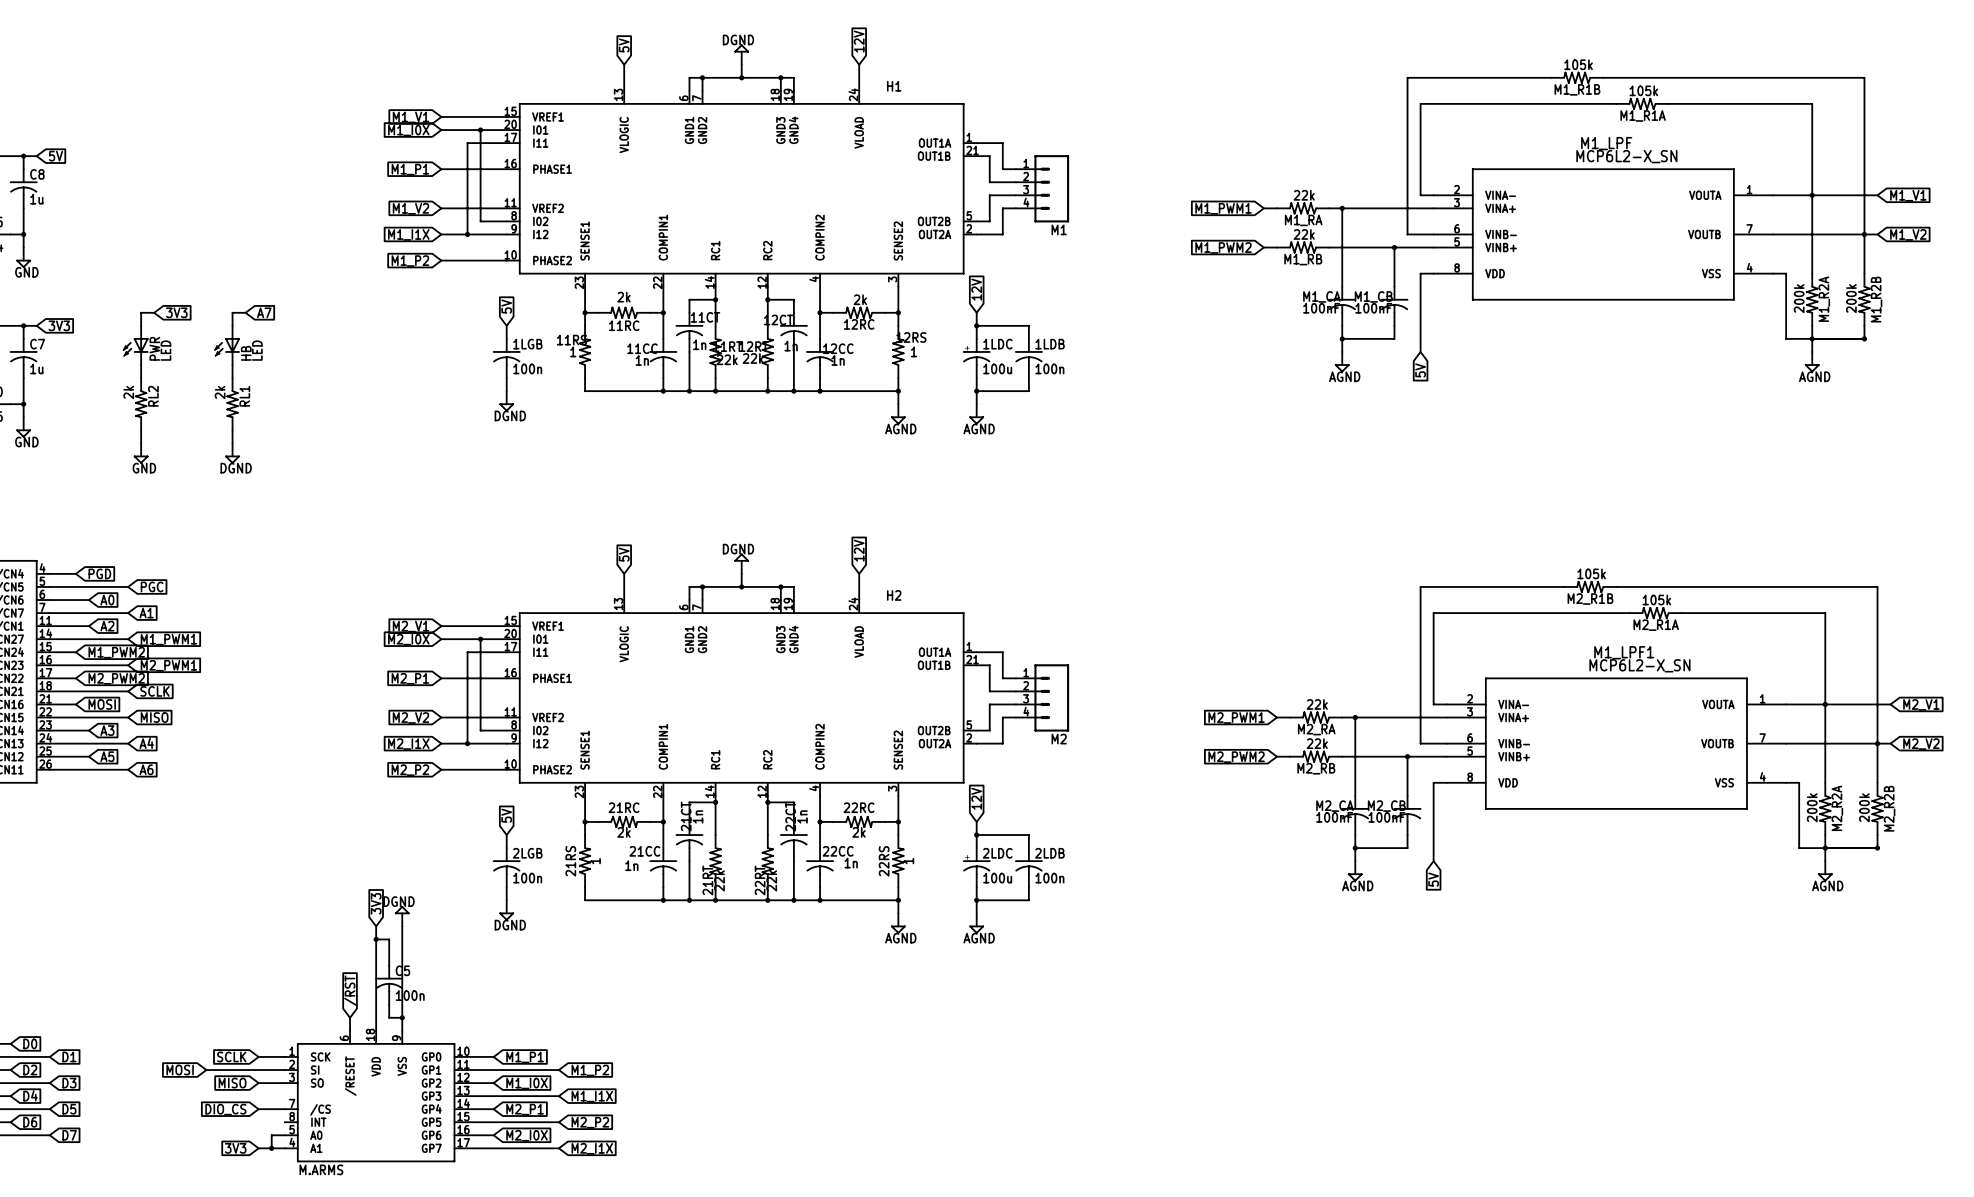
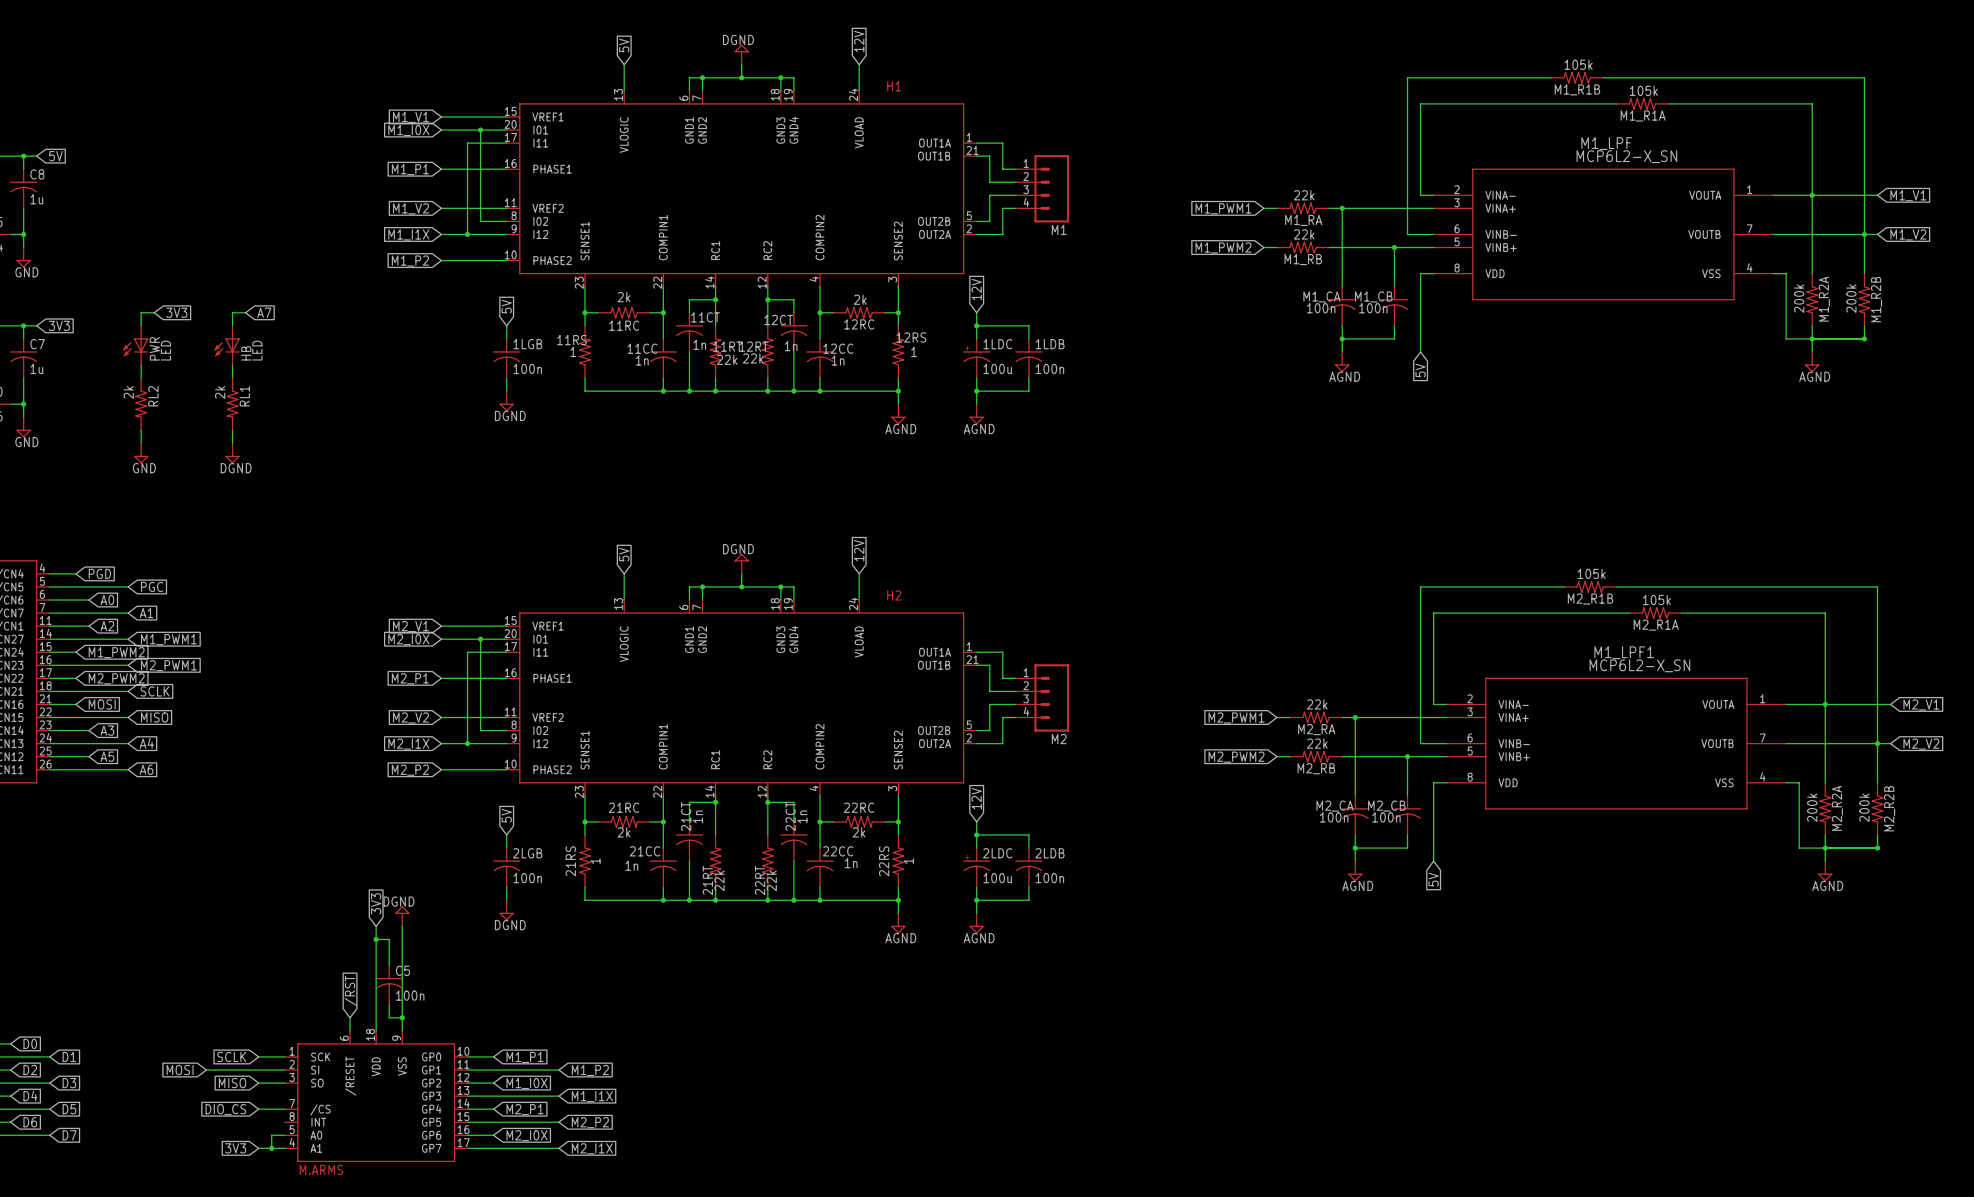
M1_CA value: 100nF (1321, 308) -> 100n (1321, 308)
M1_CB value: 100nF (1373, 308) -> 100n (1373, 308)
M2_CA value: 100nF (1334, 817) -> 100n (1334, 817)
M2_CB value: 100nF (1386, 817) -> 100n (1386, 817)

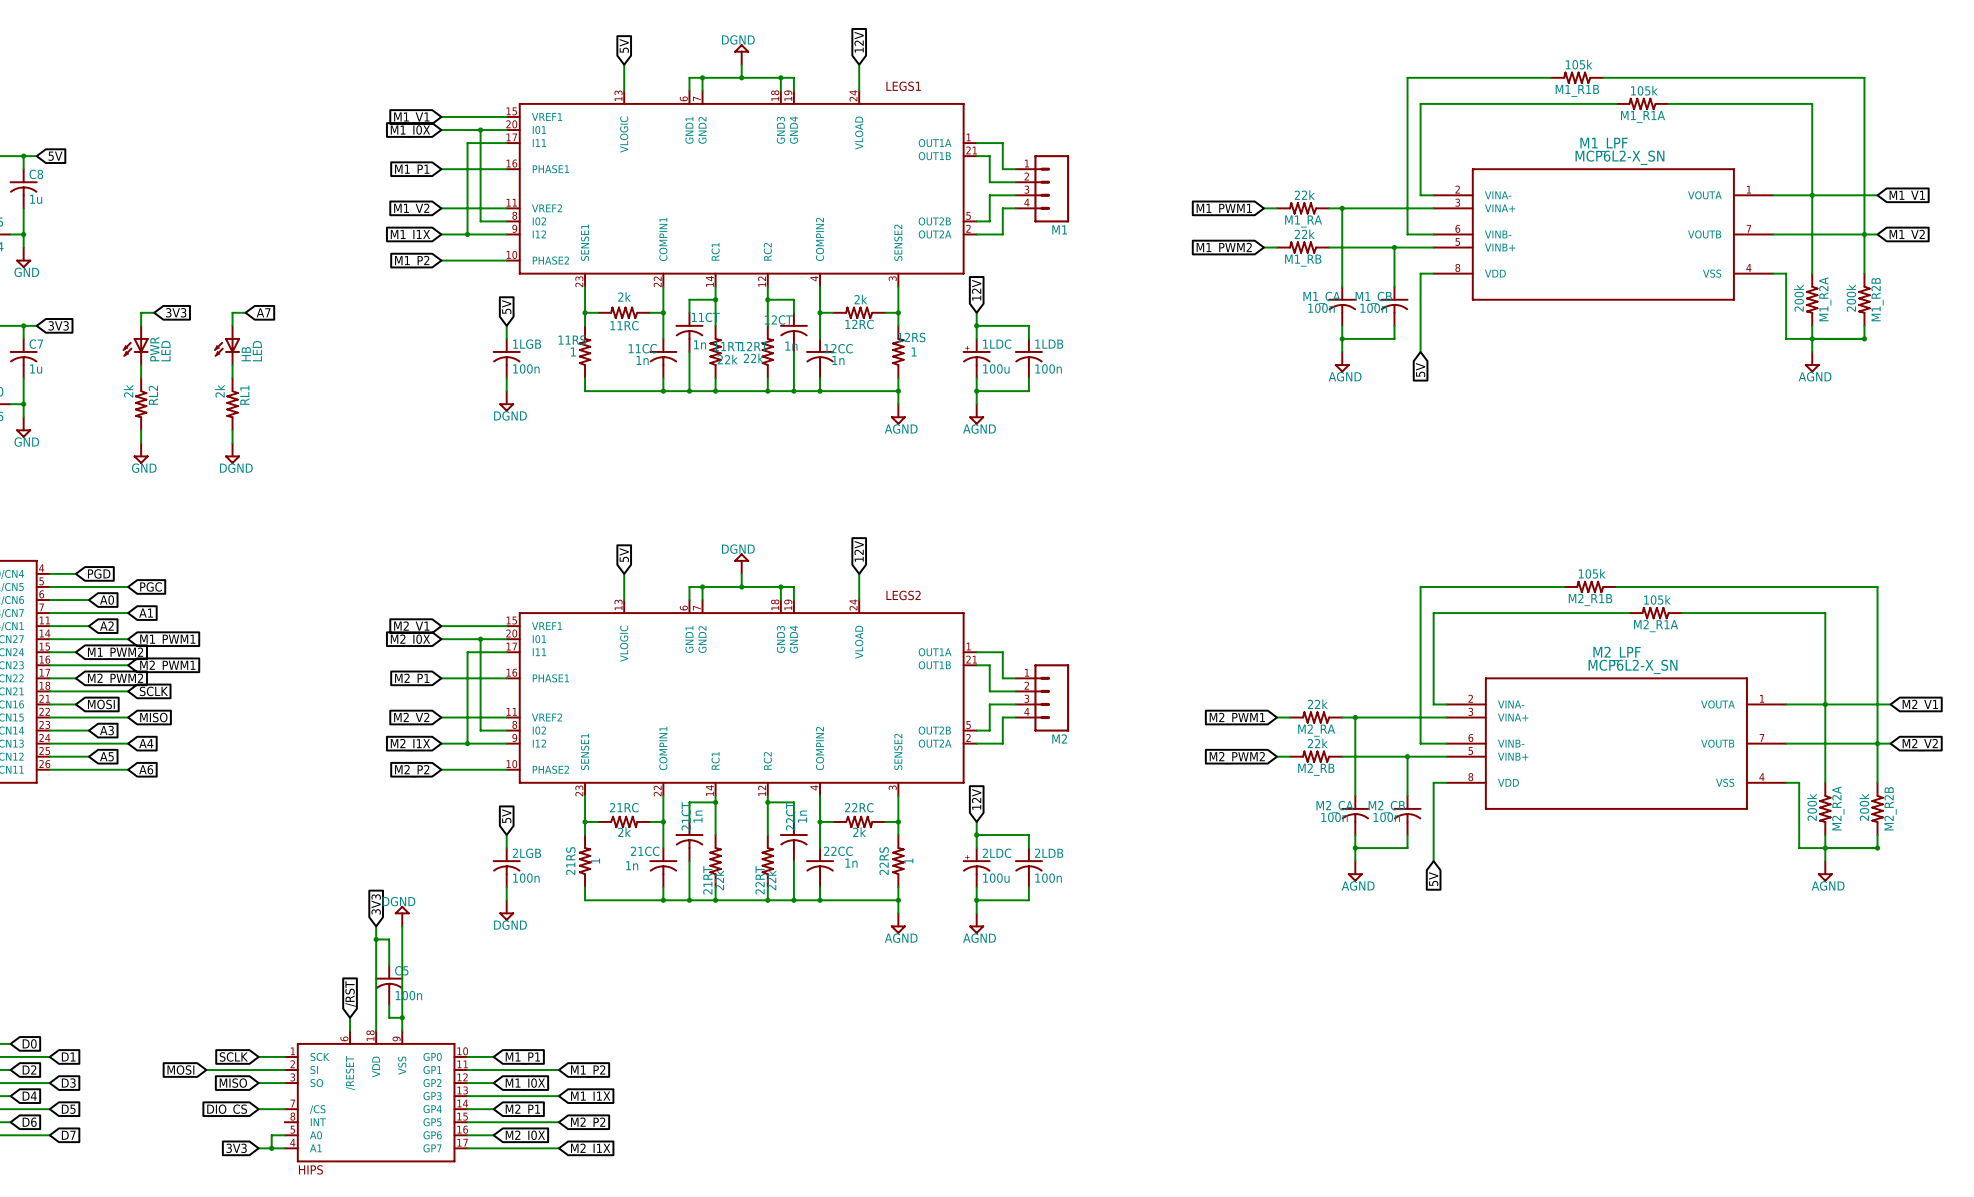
H1 name: H1 (894, 86) -> LEGS1 (903, 86)
H2 name: H2 (894, 595) -> LEGS2 (903, 595)
M1_LPF1 name: M1_LPF1 (1624, 652) -> M2_LPF (1617, 653)
M.ARMS name: M.ARMS (321, 1169) -> HIPS (310, 1169)

